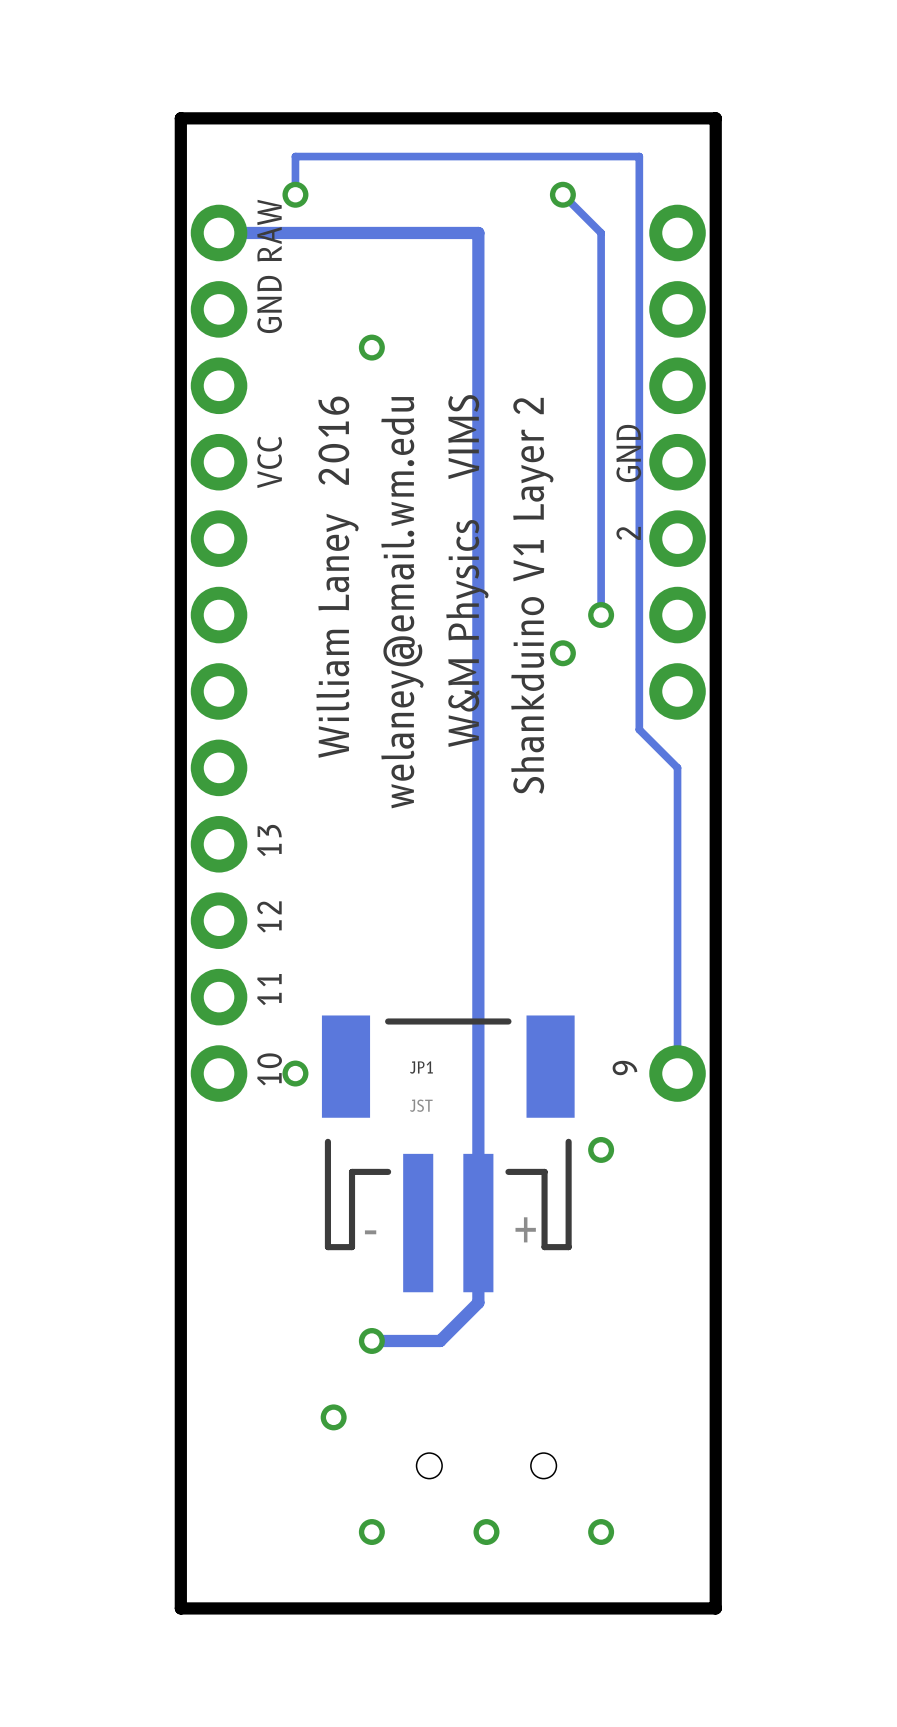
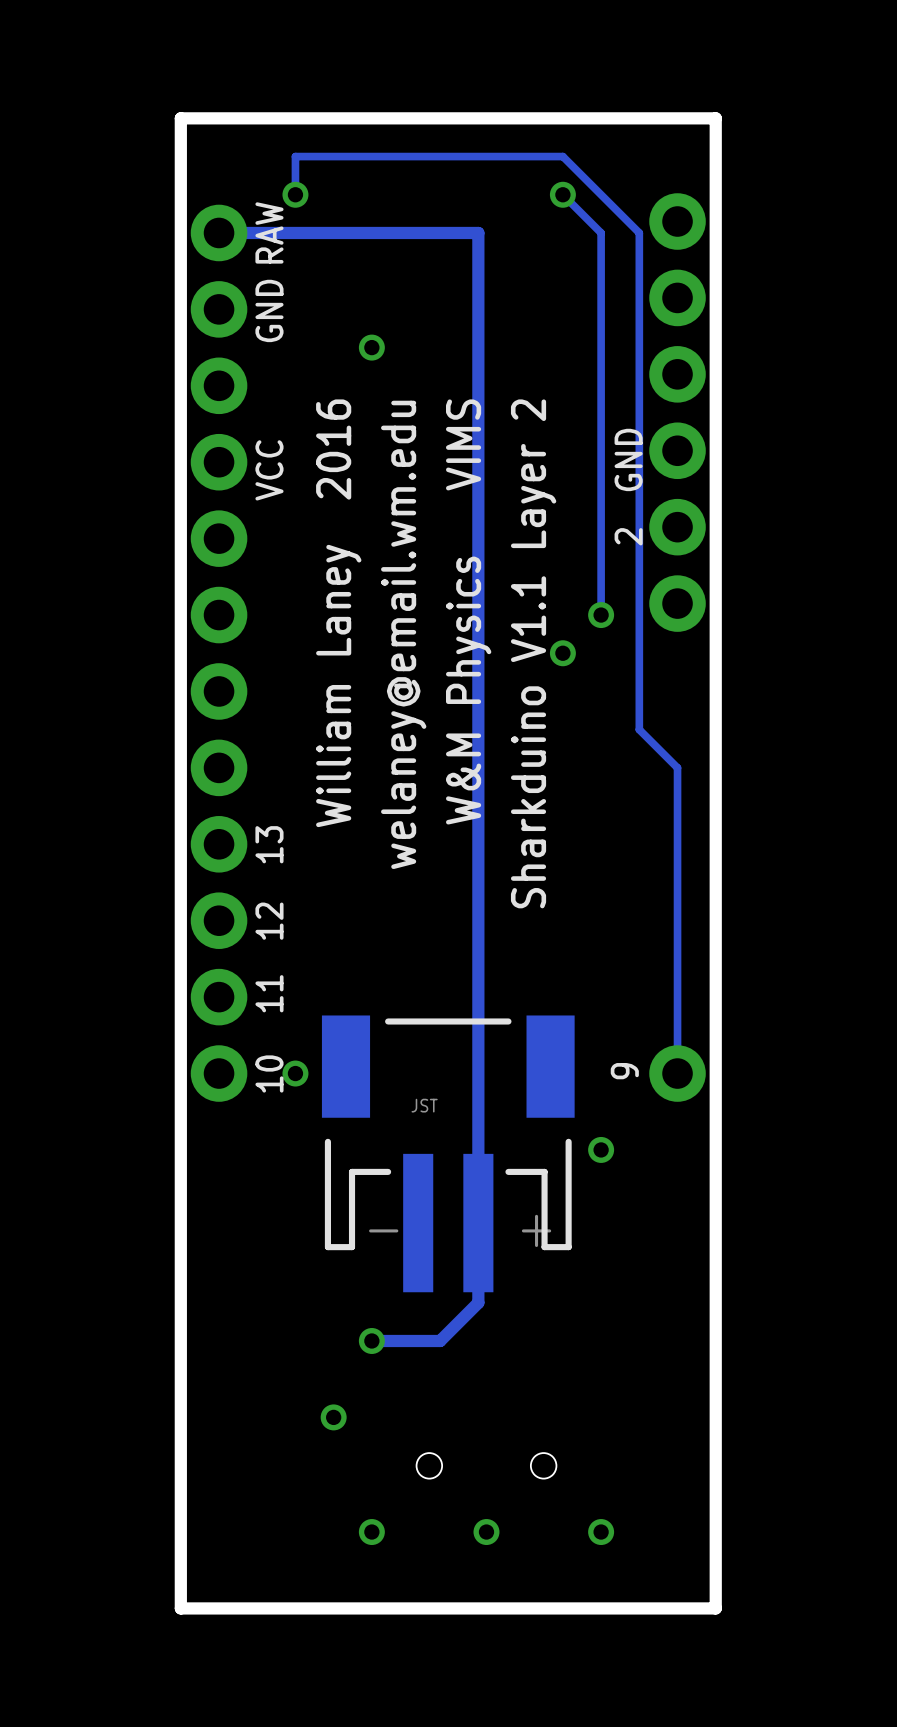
track: (562, 156) (639, 156) (639, 232) -> (562, 156) (639, 232)
part: none -> (677, 412)
part: (677, 462) -> none
text: Shankduino V1 Layer 2 (532, 595) -> Sharkduino V1.1 Layer 2 (533, 653)
JP1 name: JP1 (421, 1067) -> none

